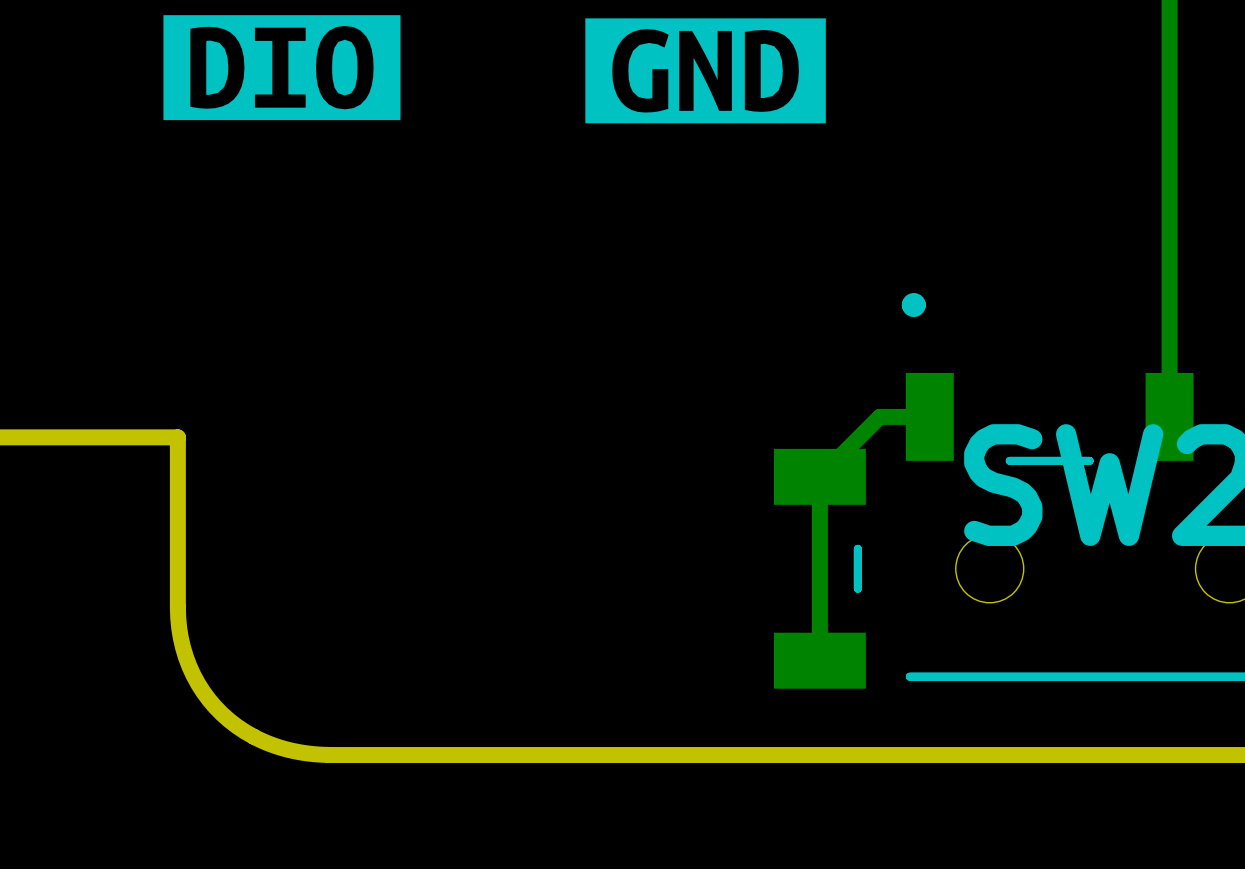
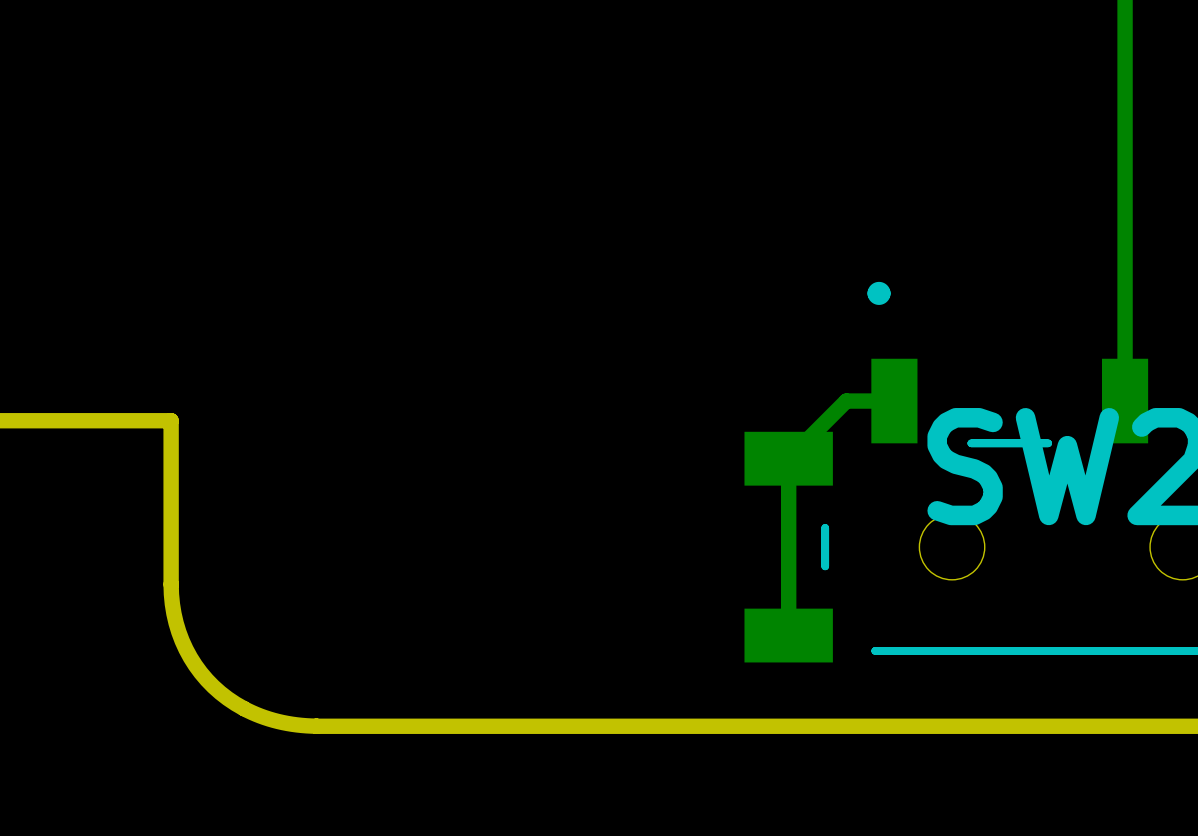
drawing: [163, 15, 401, 121] -> none
drawing: [585, 18, 826, 124] -> none

